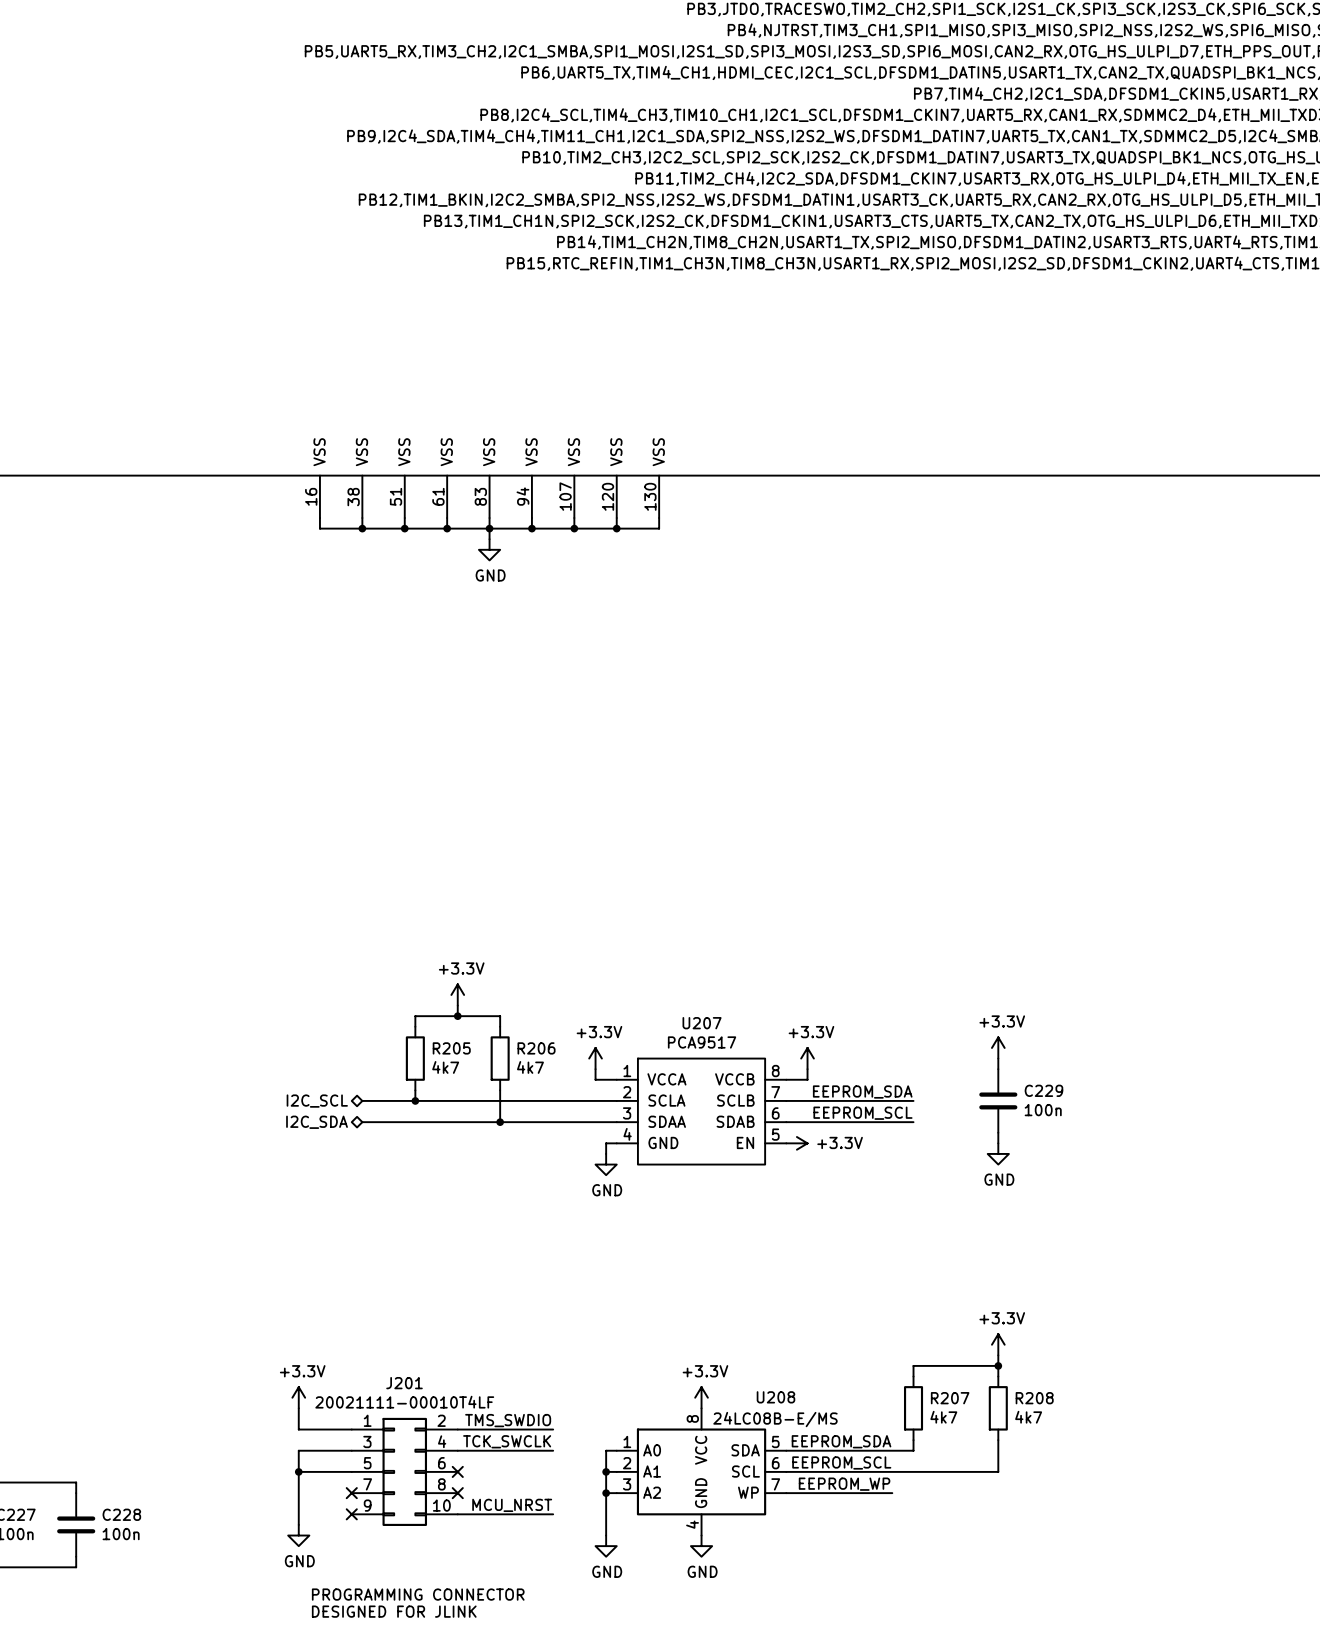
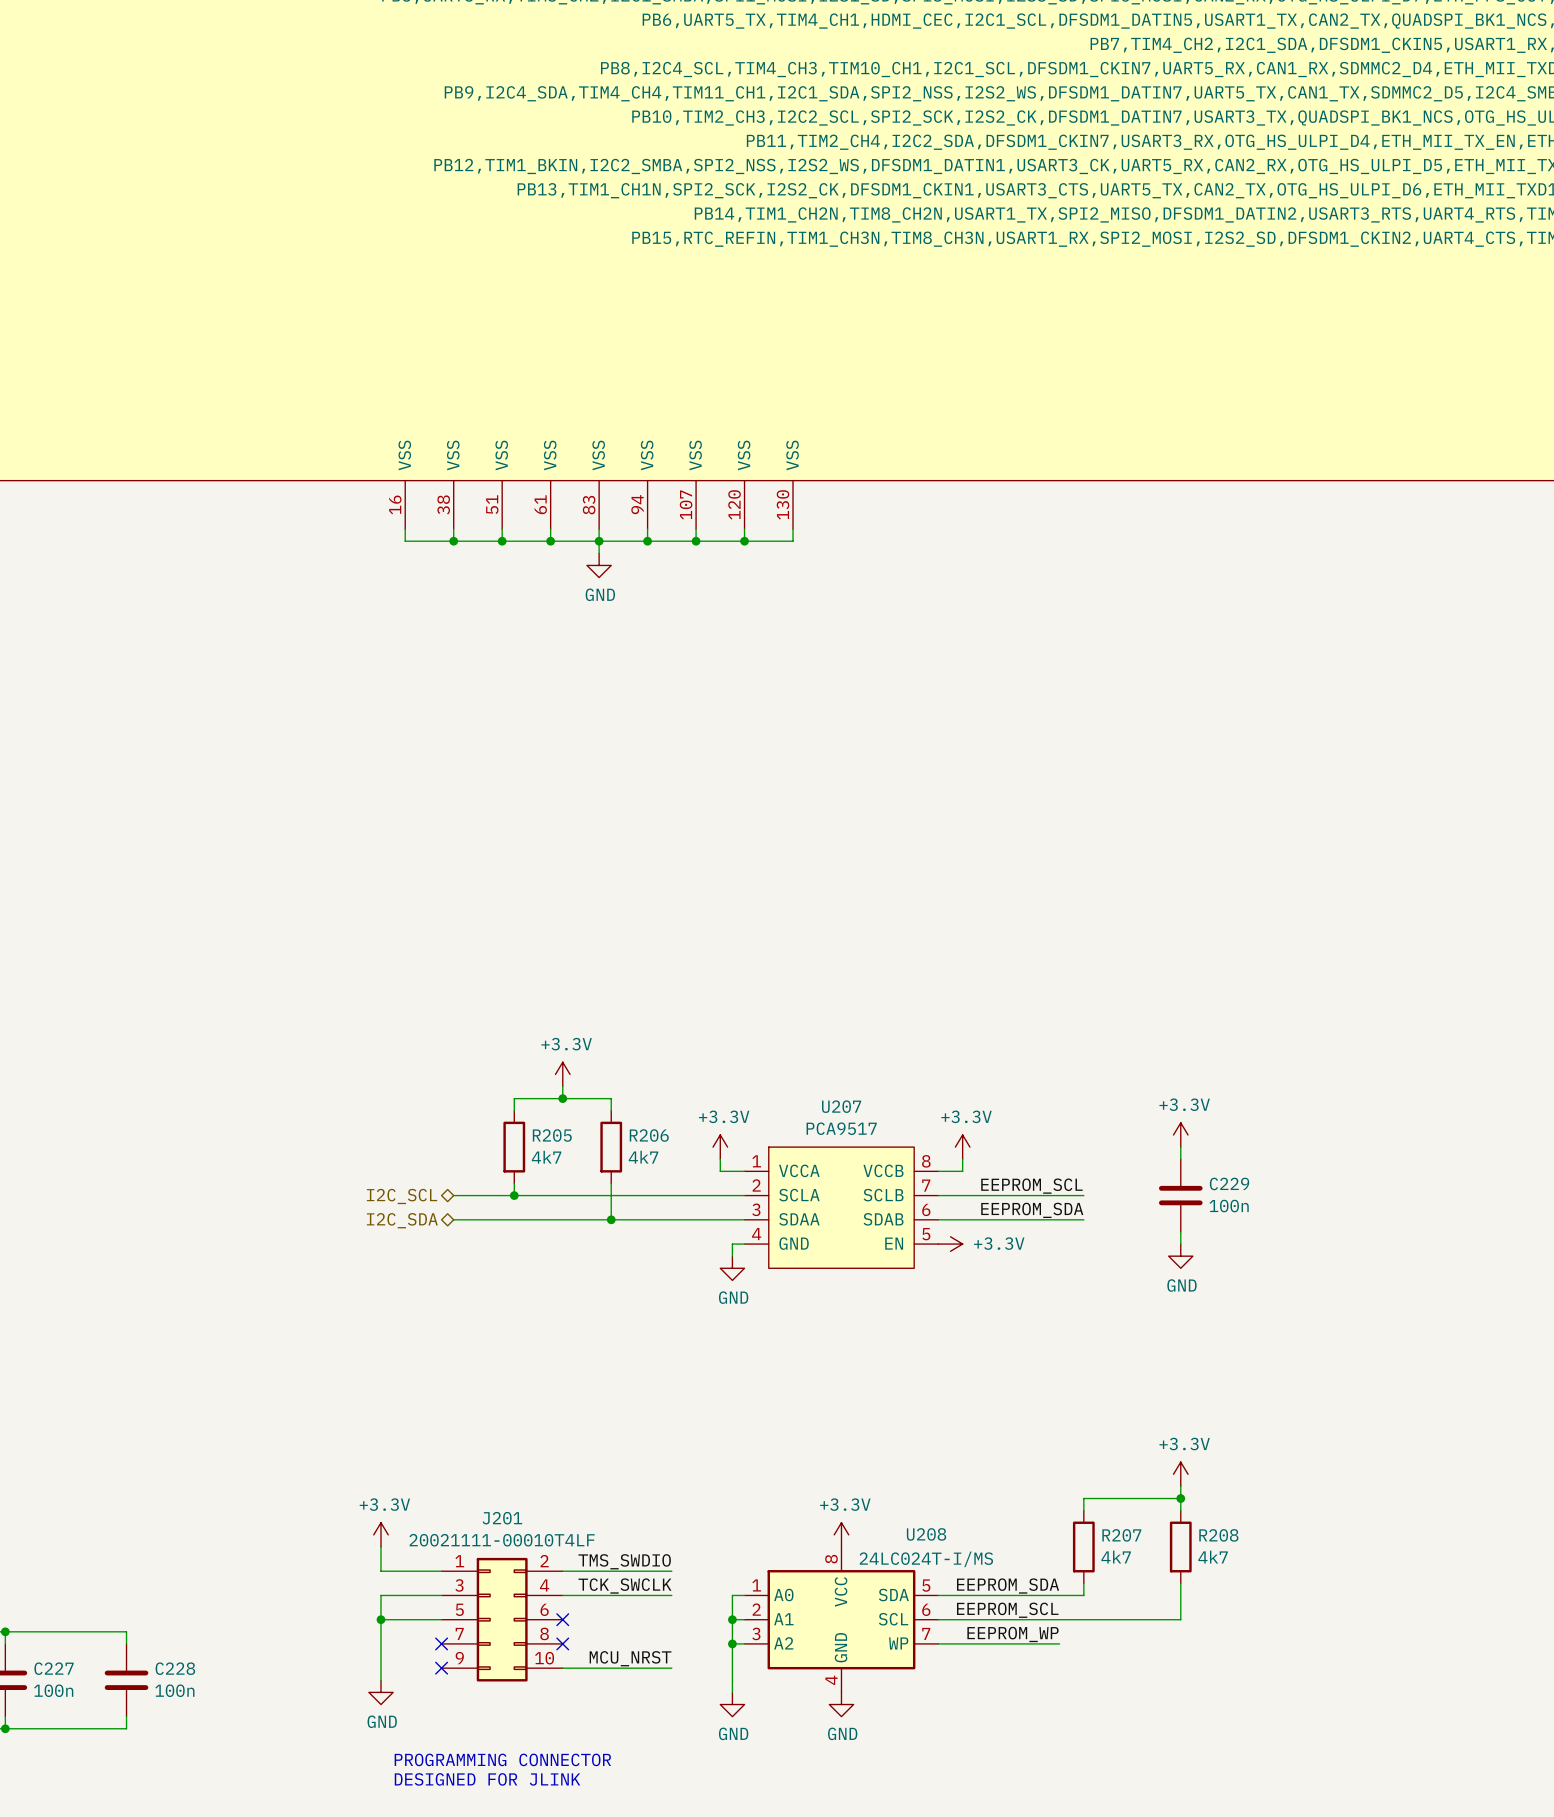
label: EEPROM_SDA (862, 1092) -> EEPROM_SCL (1031, 1186)
label: EEPROM_SCL (862, 1113) -> EEPROM_SDA (1032, 1210)
U208 value: 24LC08B-E/MS (775, 1419) -> 24LC024T-I/MS (926, 1559)

